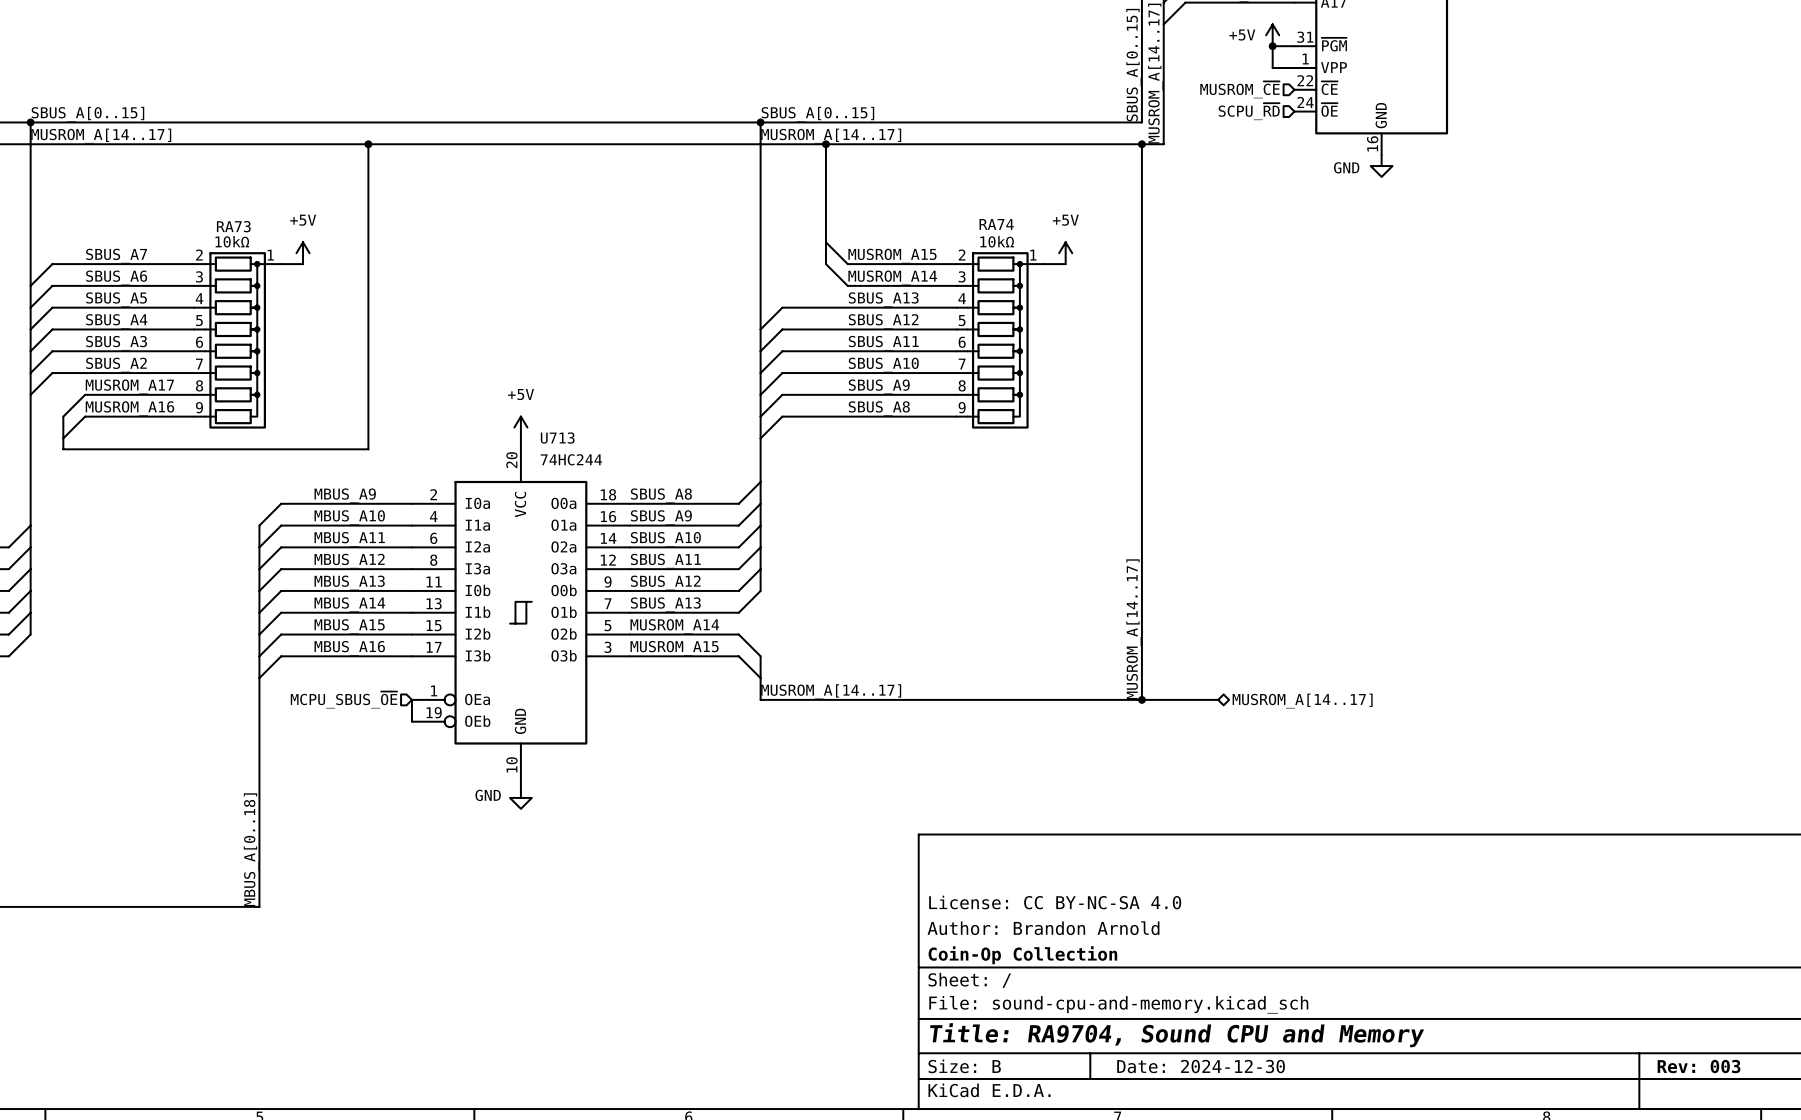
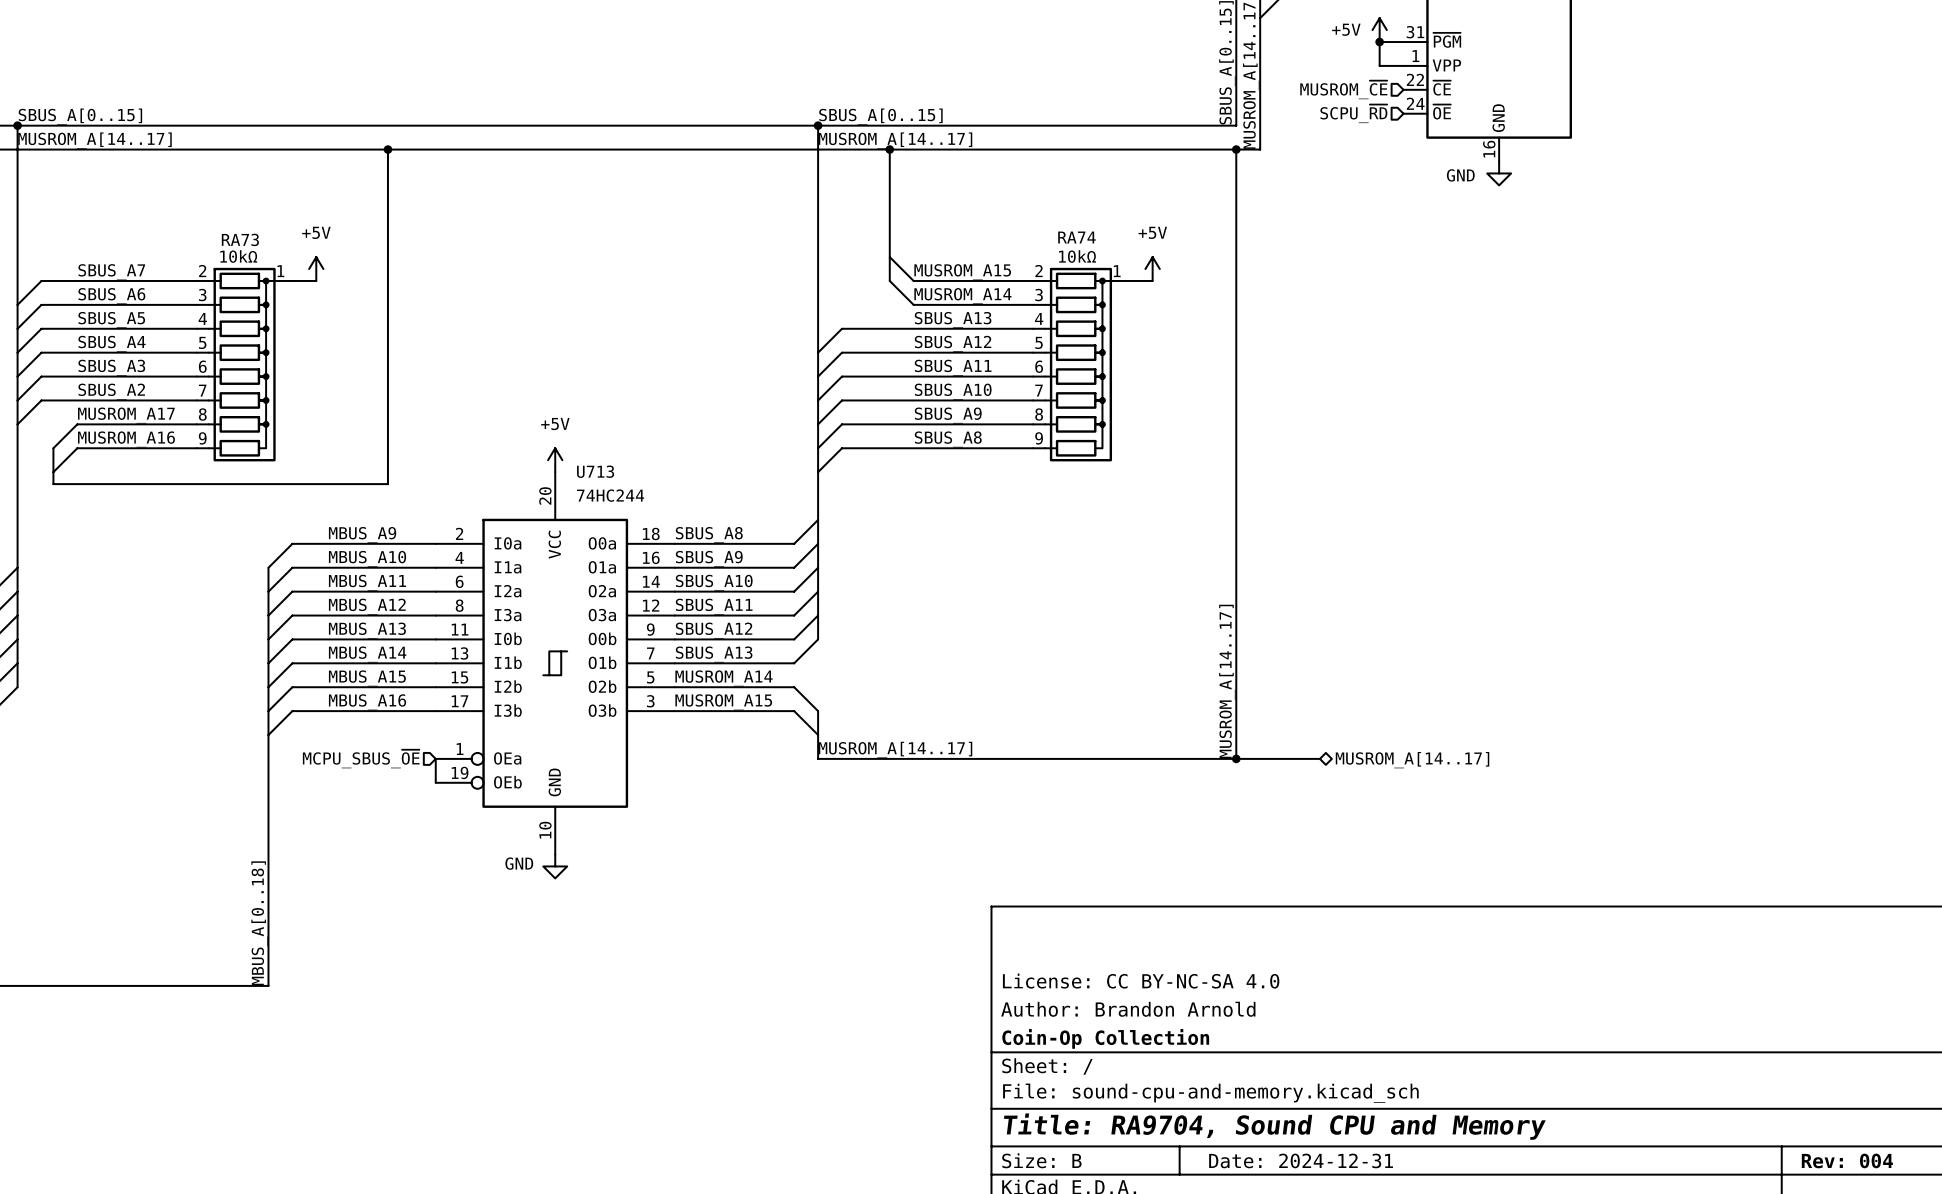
title block: Date: 2024-12-30 (1201, 1066) -> Date: 2024-12-31 (1301, 1160)
title block: Rev: 003 (1699, 1066) -> Rev: 004 (1847, 1160)

